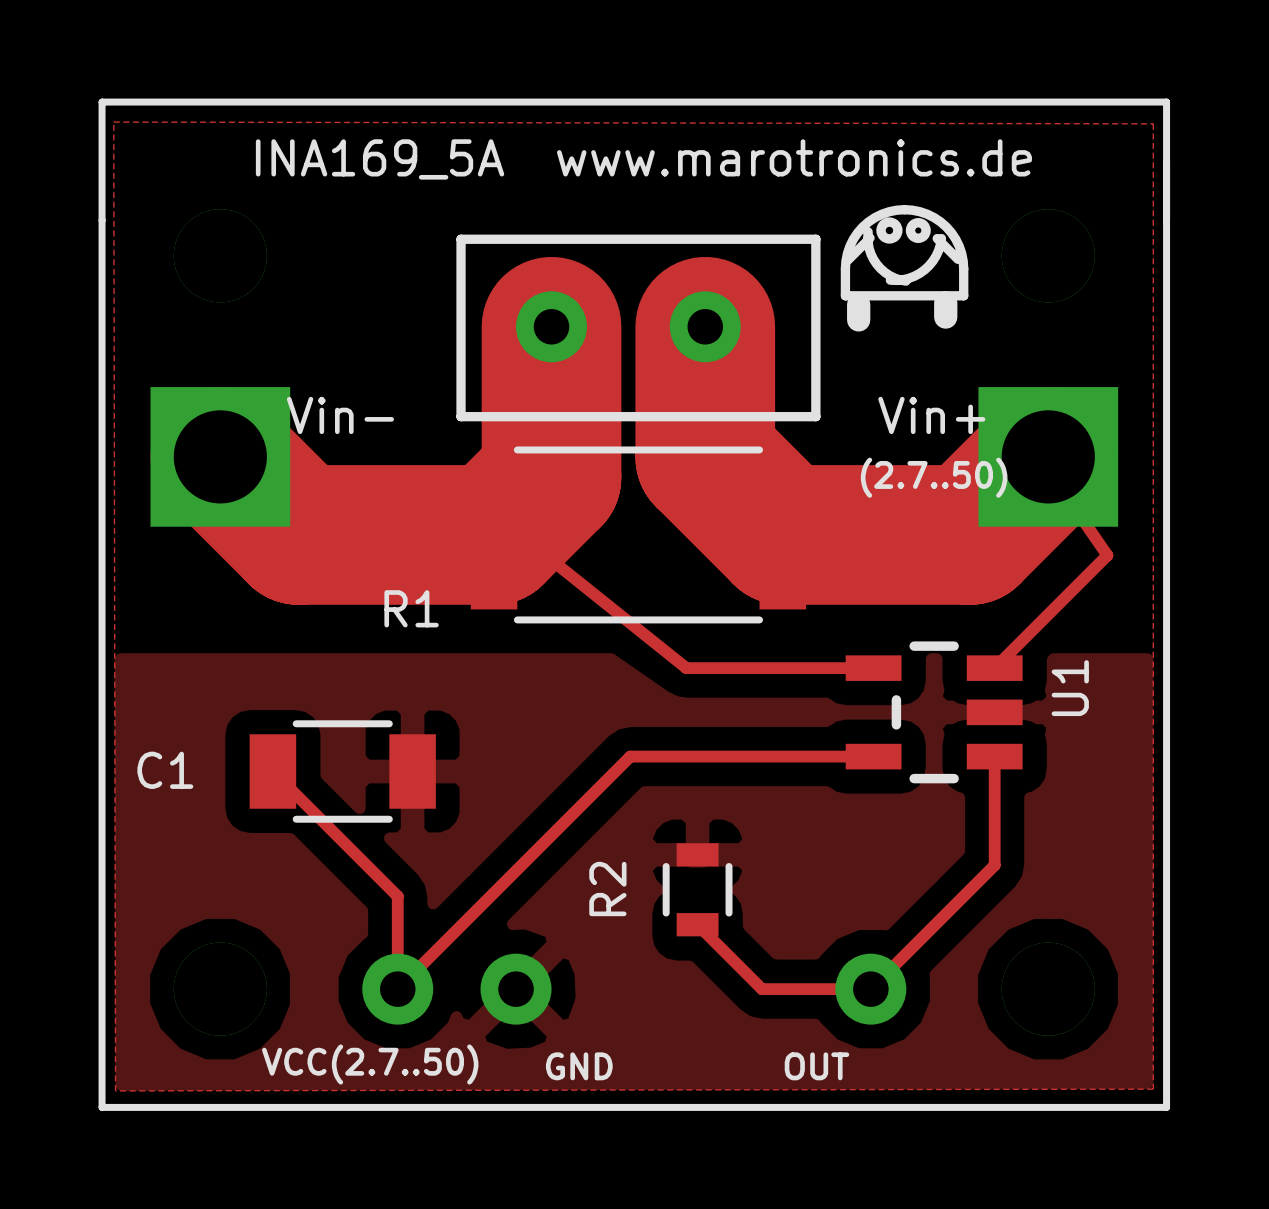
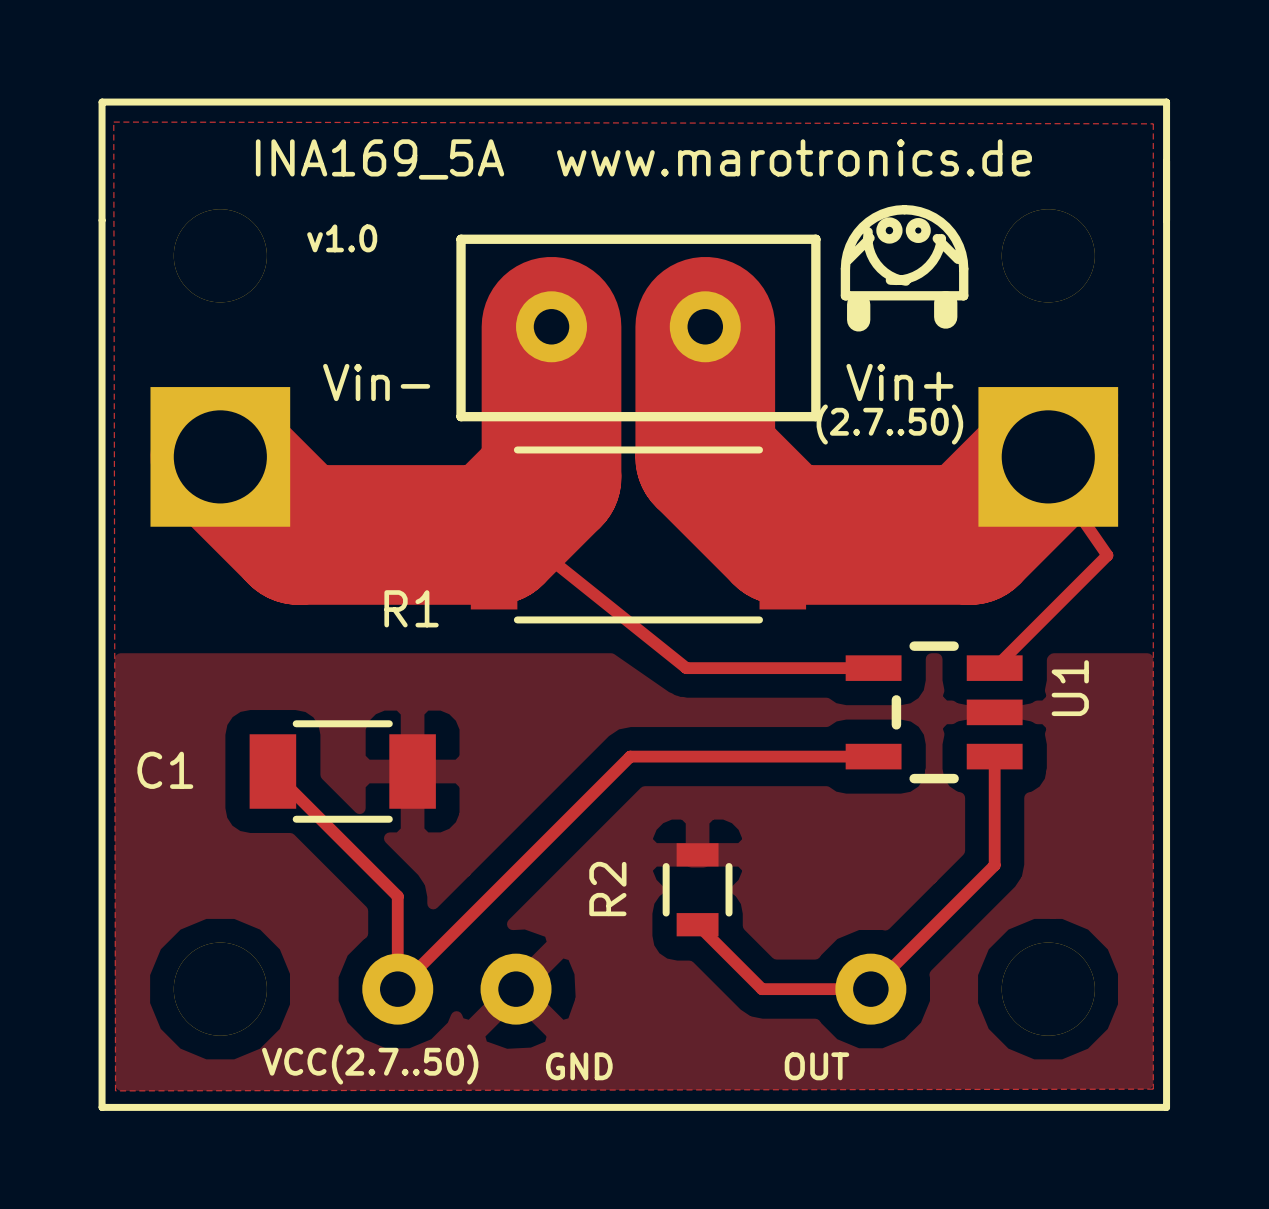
text: none -> v1.0 (342, 238)
text position: Vin- (340, 415) -> Vin- (376, 382)
text position: Vin+ (931, 415) -> Vin+ (899, 382)
text position: (2.7..50) (934, 477) -> (2.7..50) (889, 424)

